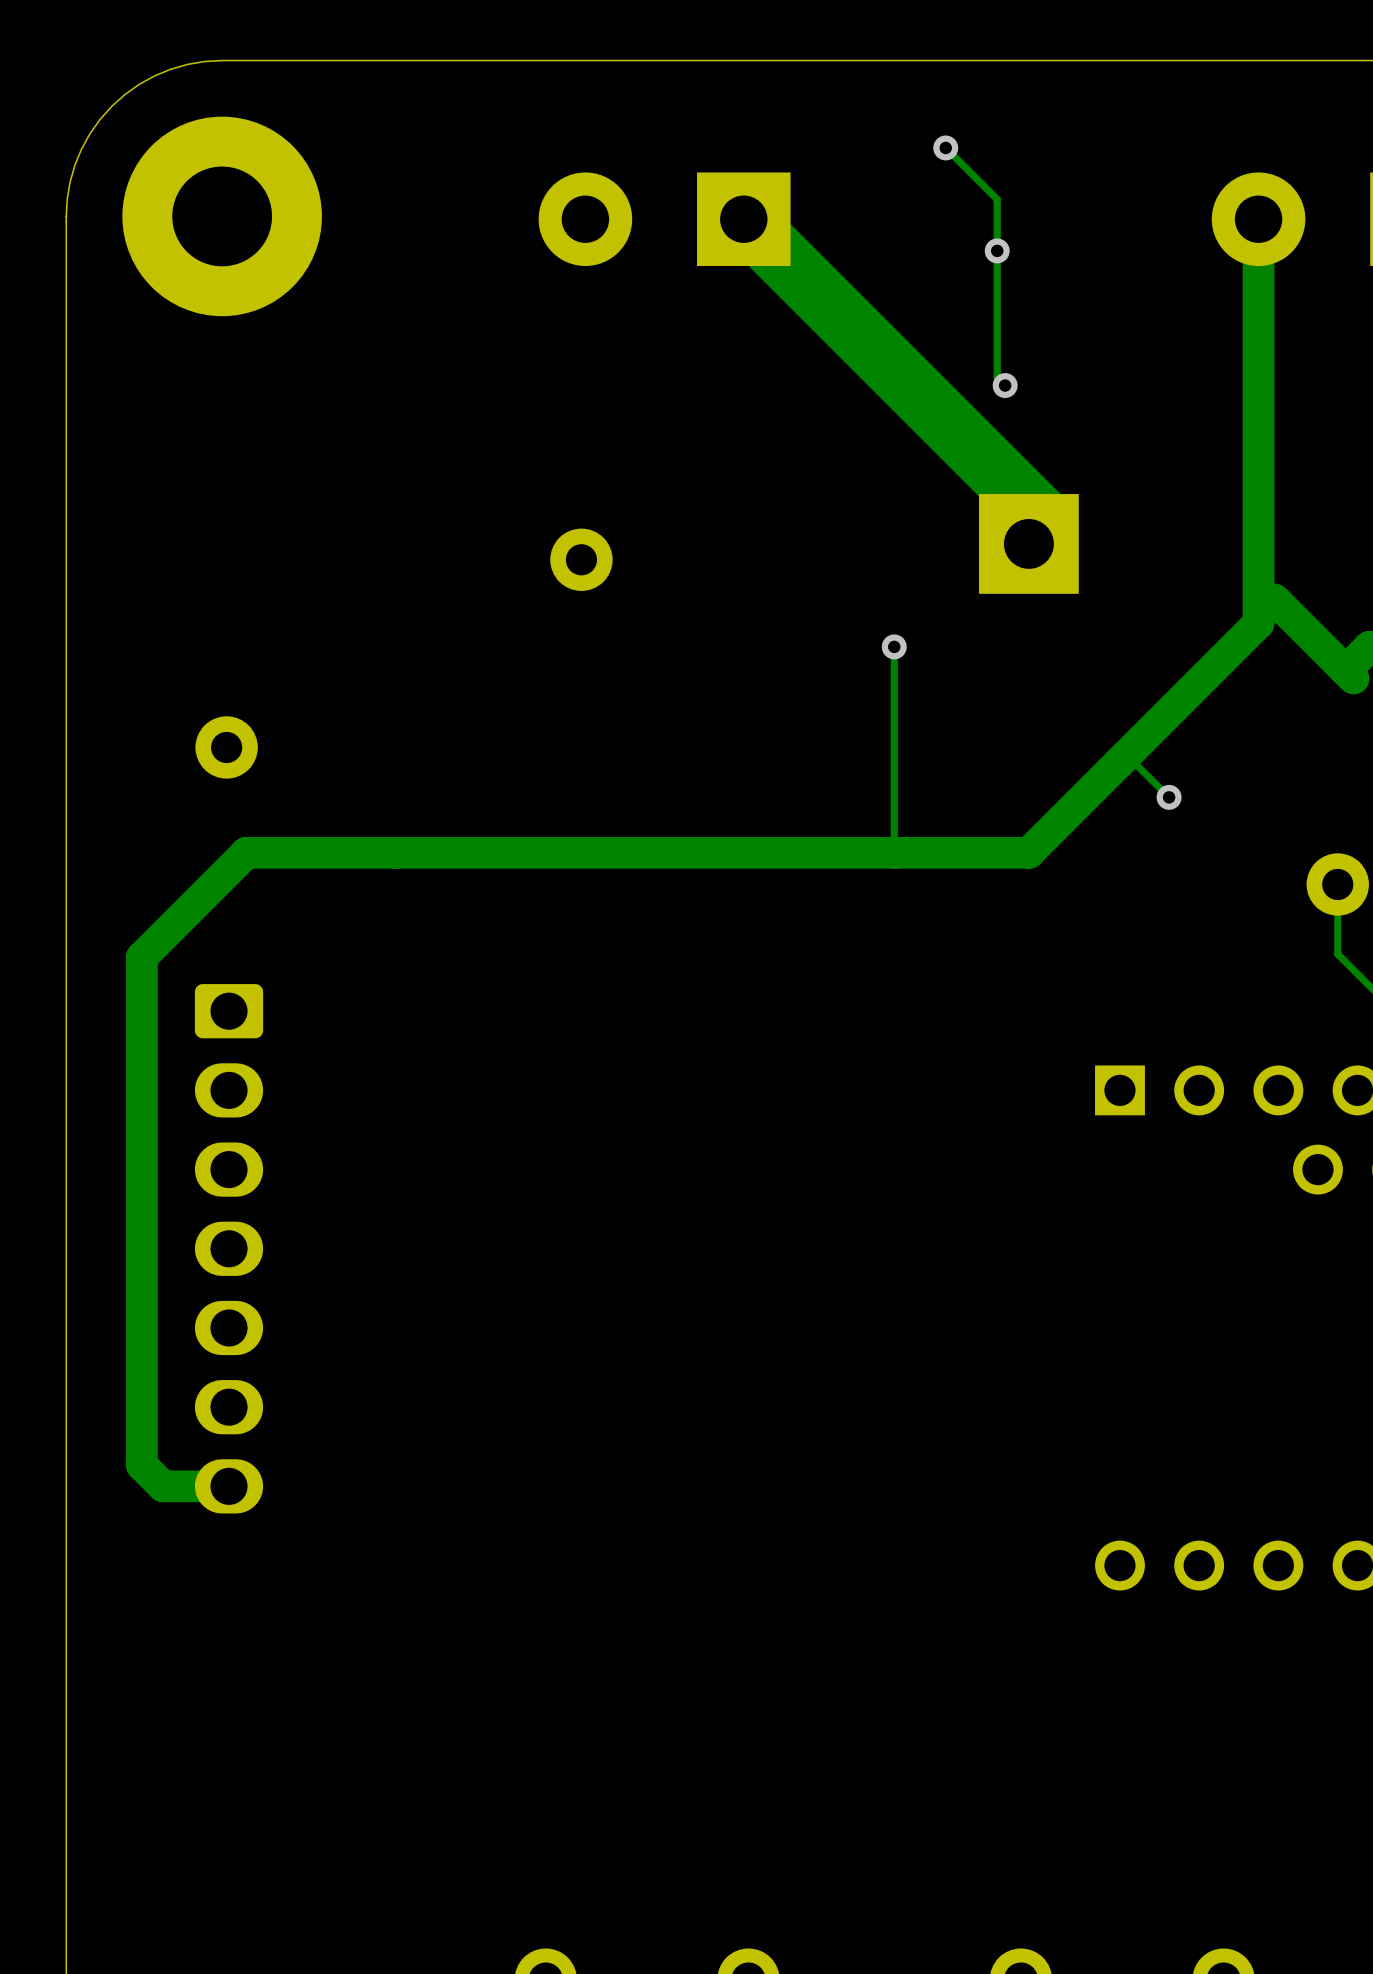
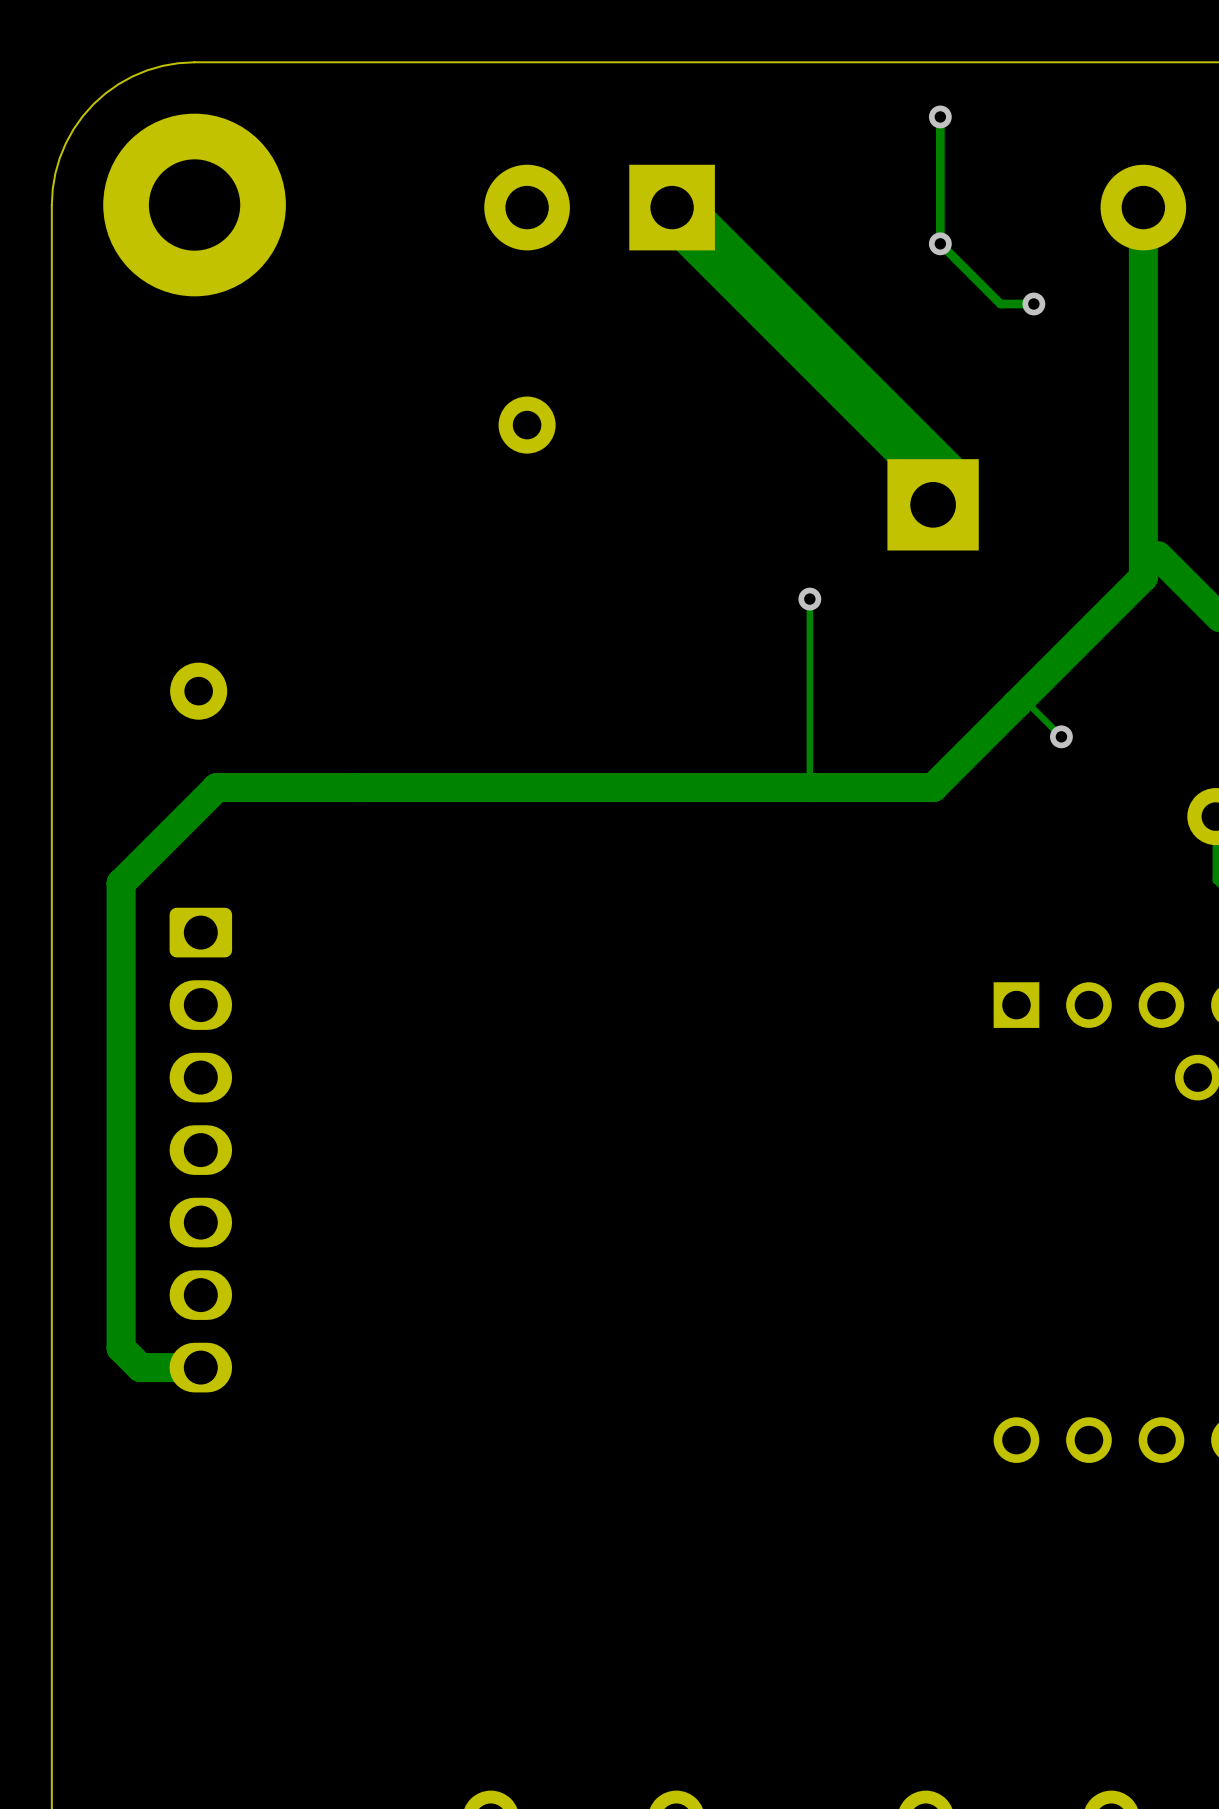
track: none -> (940, 116) (940, 243) (1000, 304) (1033, 304)
via: none -> (940, 116)
track: (945, 147) (997, 199) (997, 377) (1005, 385) -> none
via: (945, 147) -> none
via position: (997, 250) -> (940, 243)
via: none -> (1033, 304)
via: (1005, 385) -> none
part position: (581, 559) -> (527, 425)

